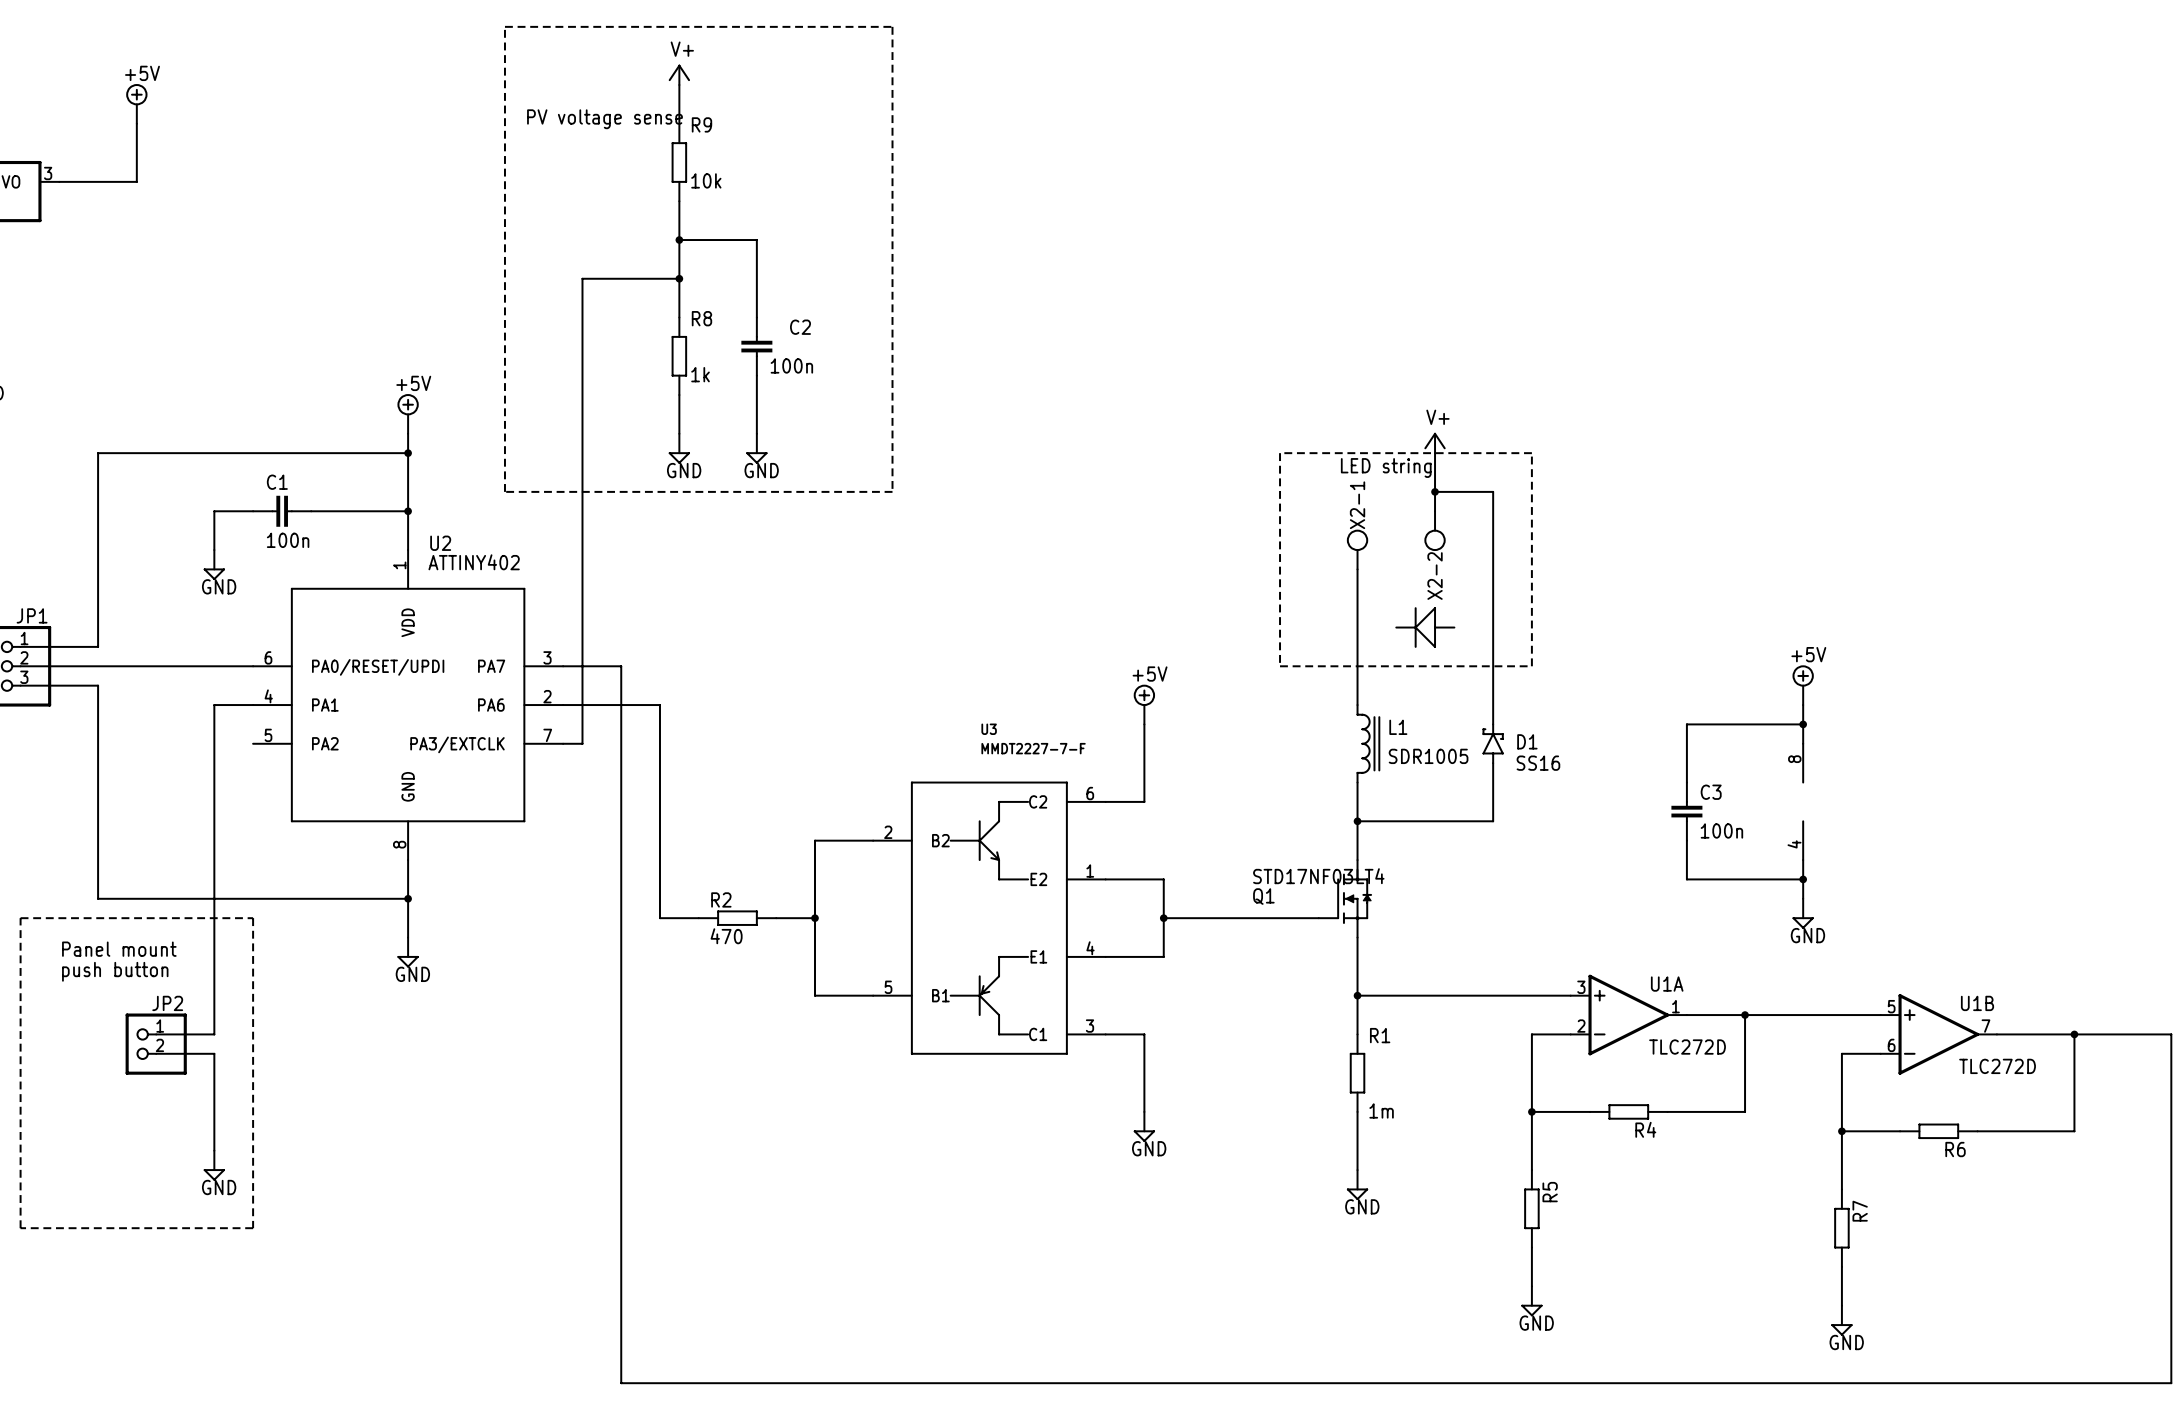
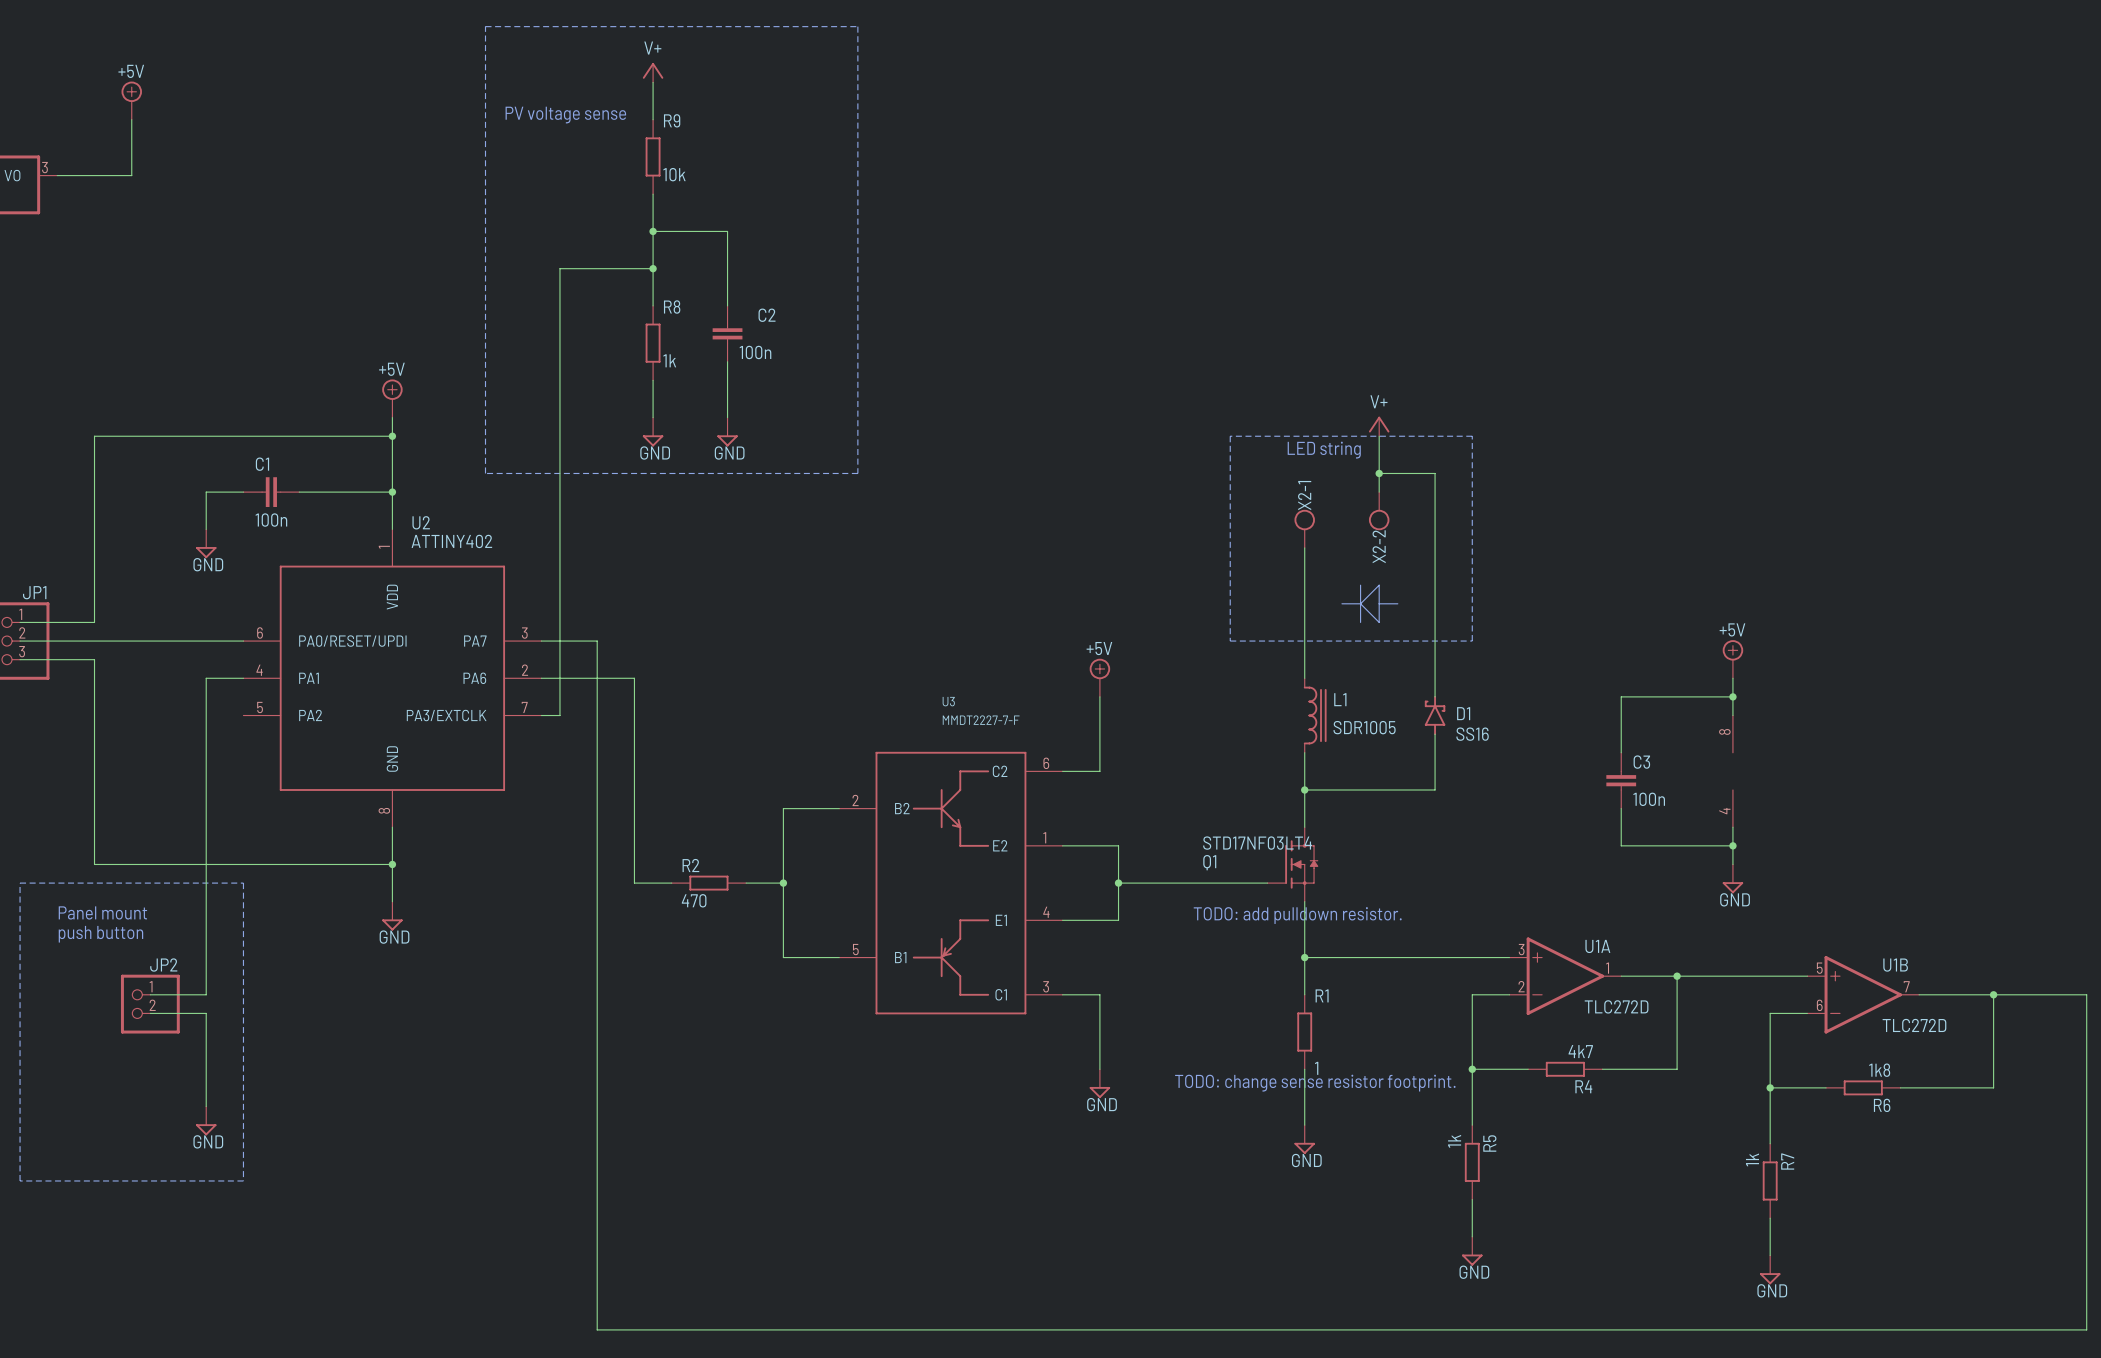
text: none -> TODO: add pulldown resistor. (1297, 915)
R4 value: none -> 4k7 (1580, 1051)
R1 value: 1m (1381, 1110) -> 1 (1316, 1068)
R6 value: none -> 1k8 (1879, 1070)
text: none -> TODO: change sense resistor footprint. (1315, 1083)
R5 value: none -> 1k (1454, 1141)
R7 value: none -> 1k (1752, 1159)

